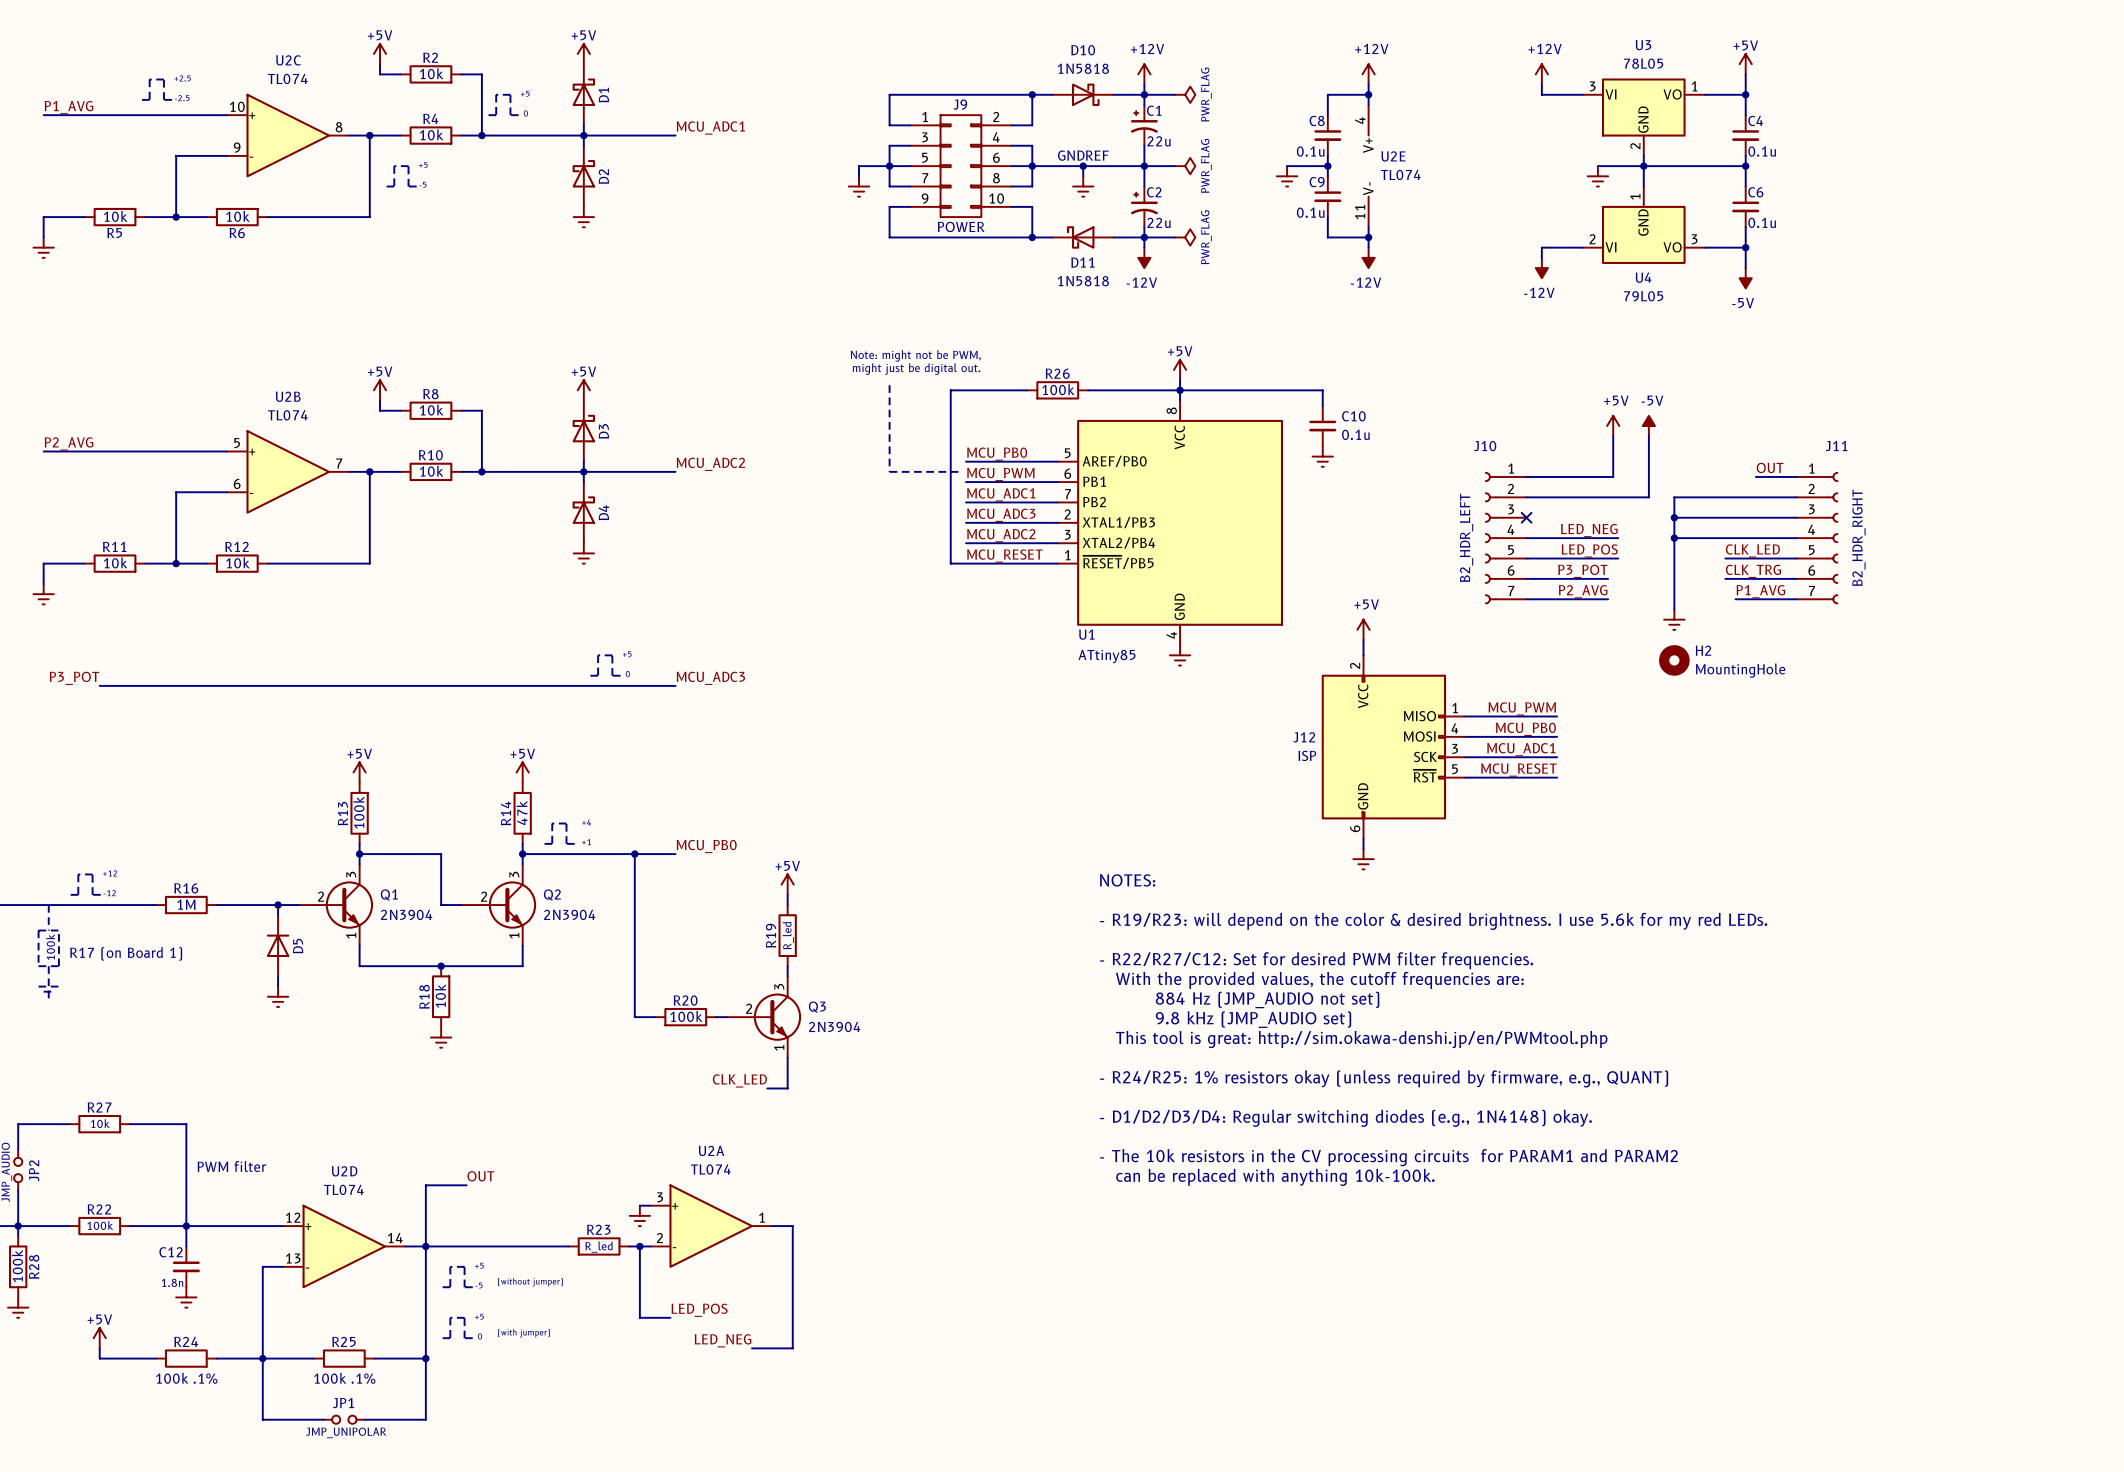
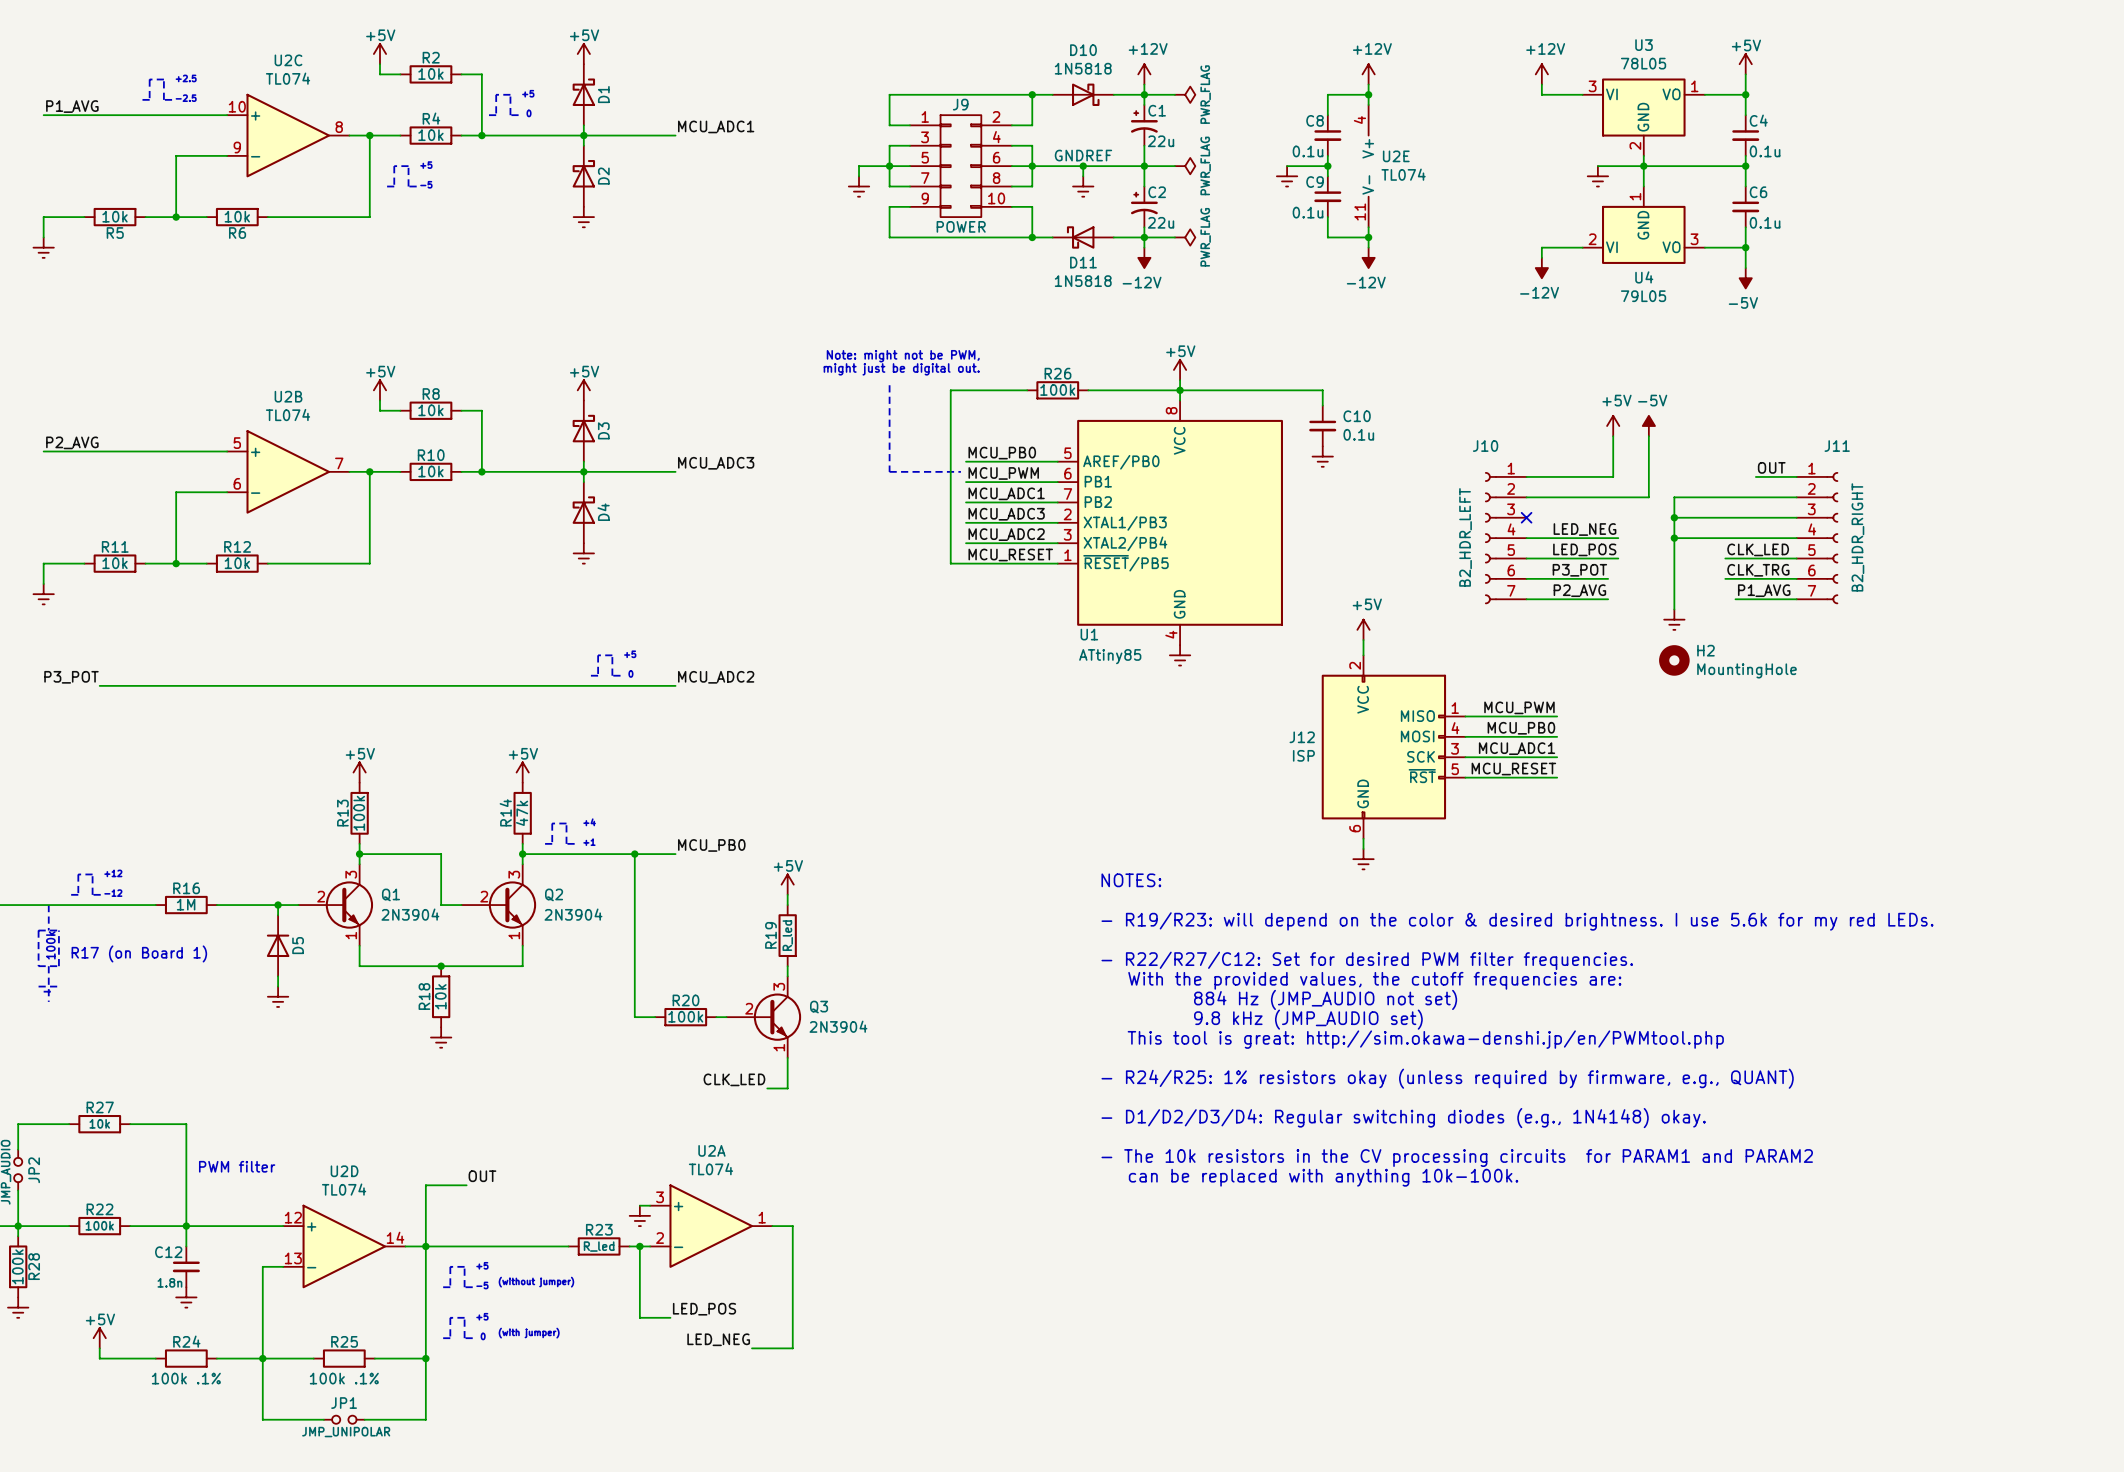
label: MCU_ADC2 (710, 464) -> MCU_ADC3 (716, 463)
label: MCU_ADC3 (710, 678) -> MCU_ADC2 (716, 677)

